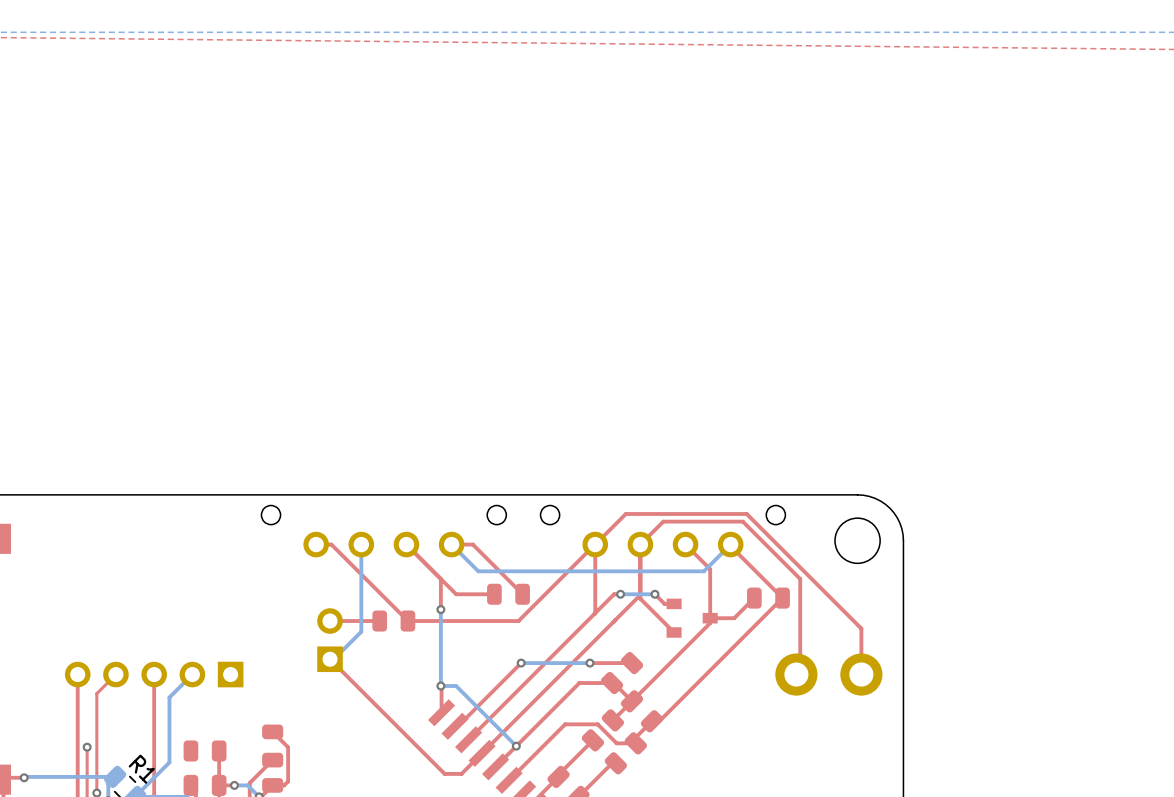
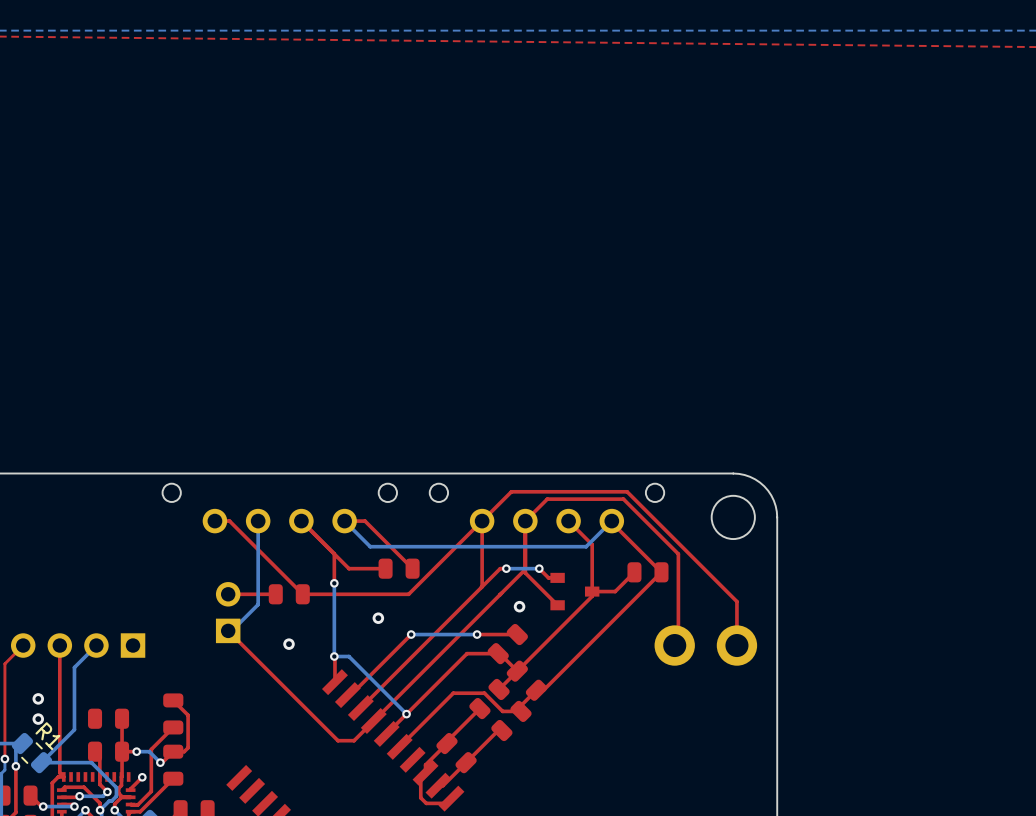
via: none -> (519, 606)
via: none -> (378, 618)
via: none -> (289, 644)
via: none -> (38, 698)
via: none -> (38, 719)

